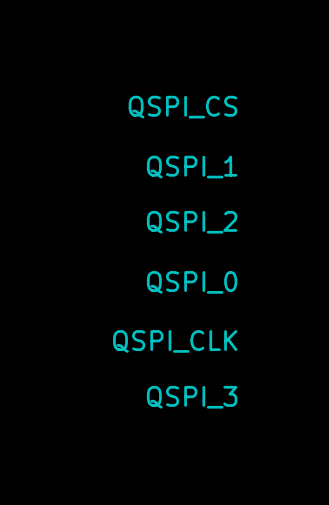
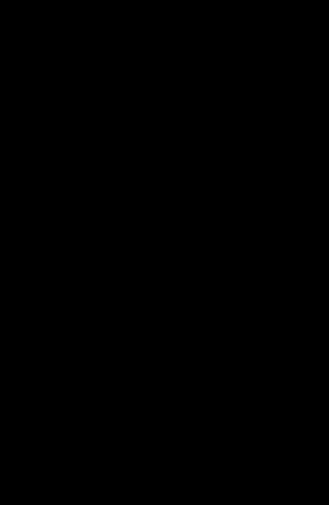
text: QSPI_CS (182, 107) -> none
text: QSPI_1 (192, 167) -> none
text: QSPI_2 (192, 222) -> none
text: QSPI_0 (192, 282) -> none
text: QSPI_CLK (175, 341) -> none
text: QSPI_3 (192, 397) -> none

